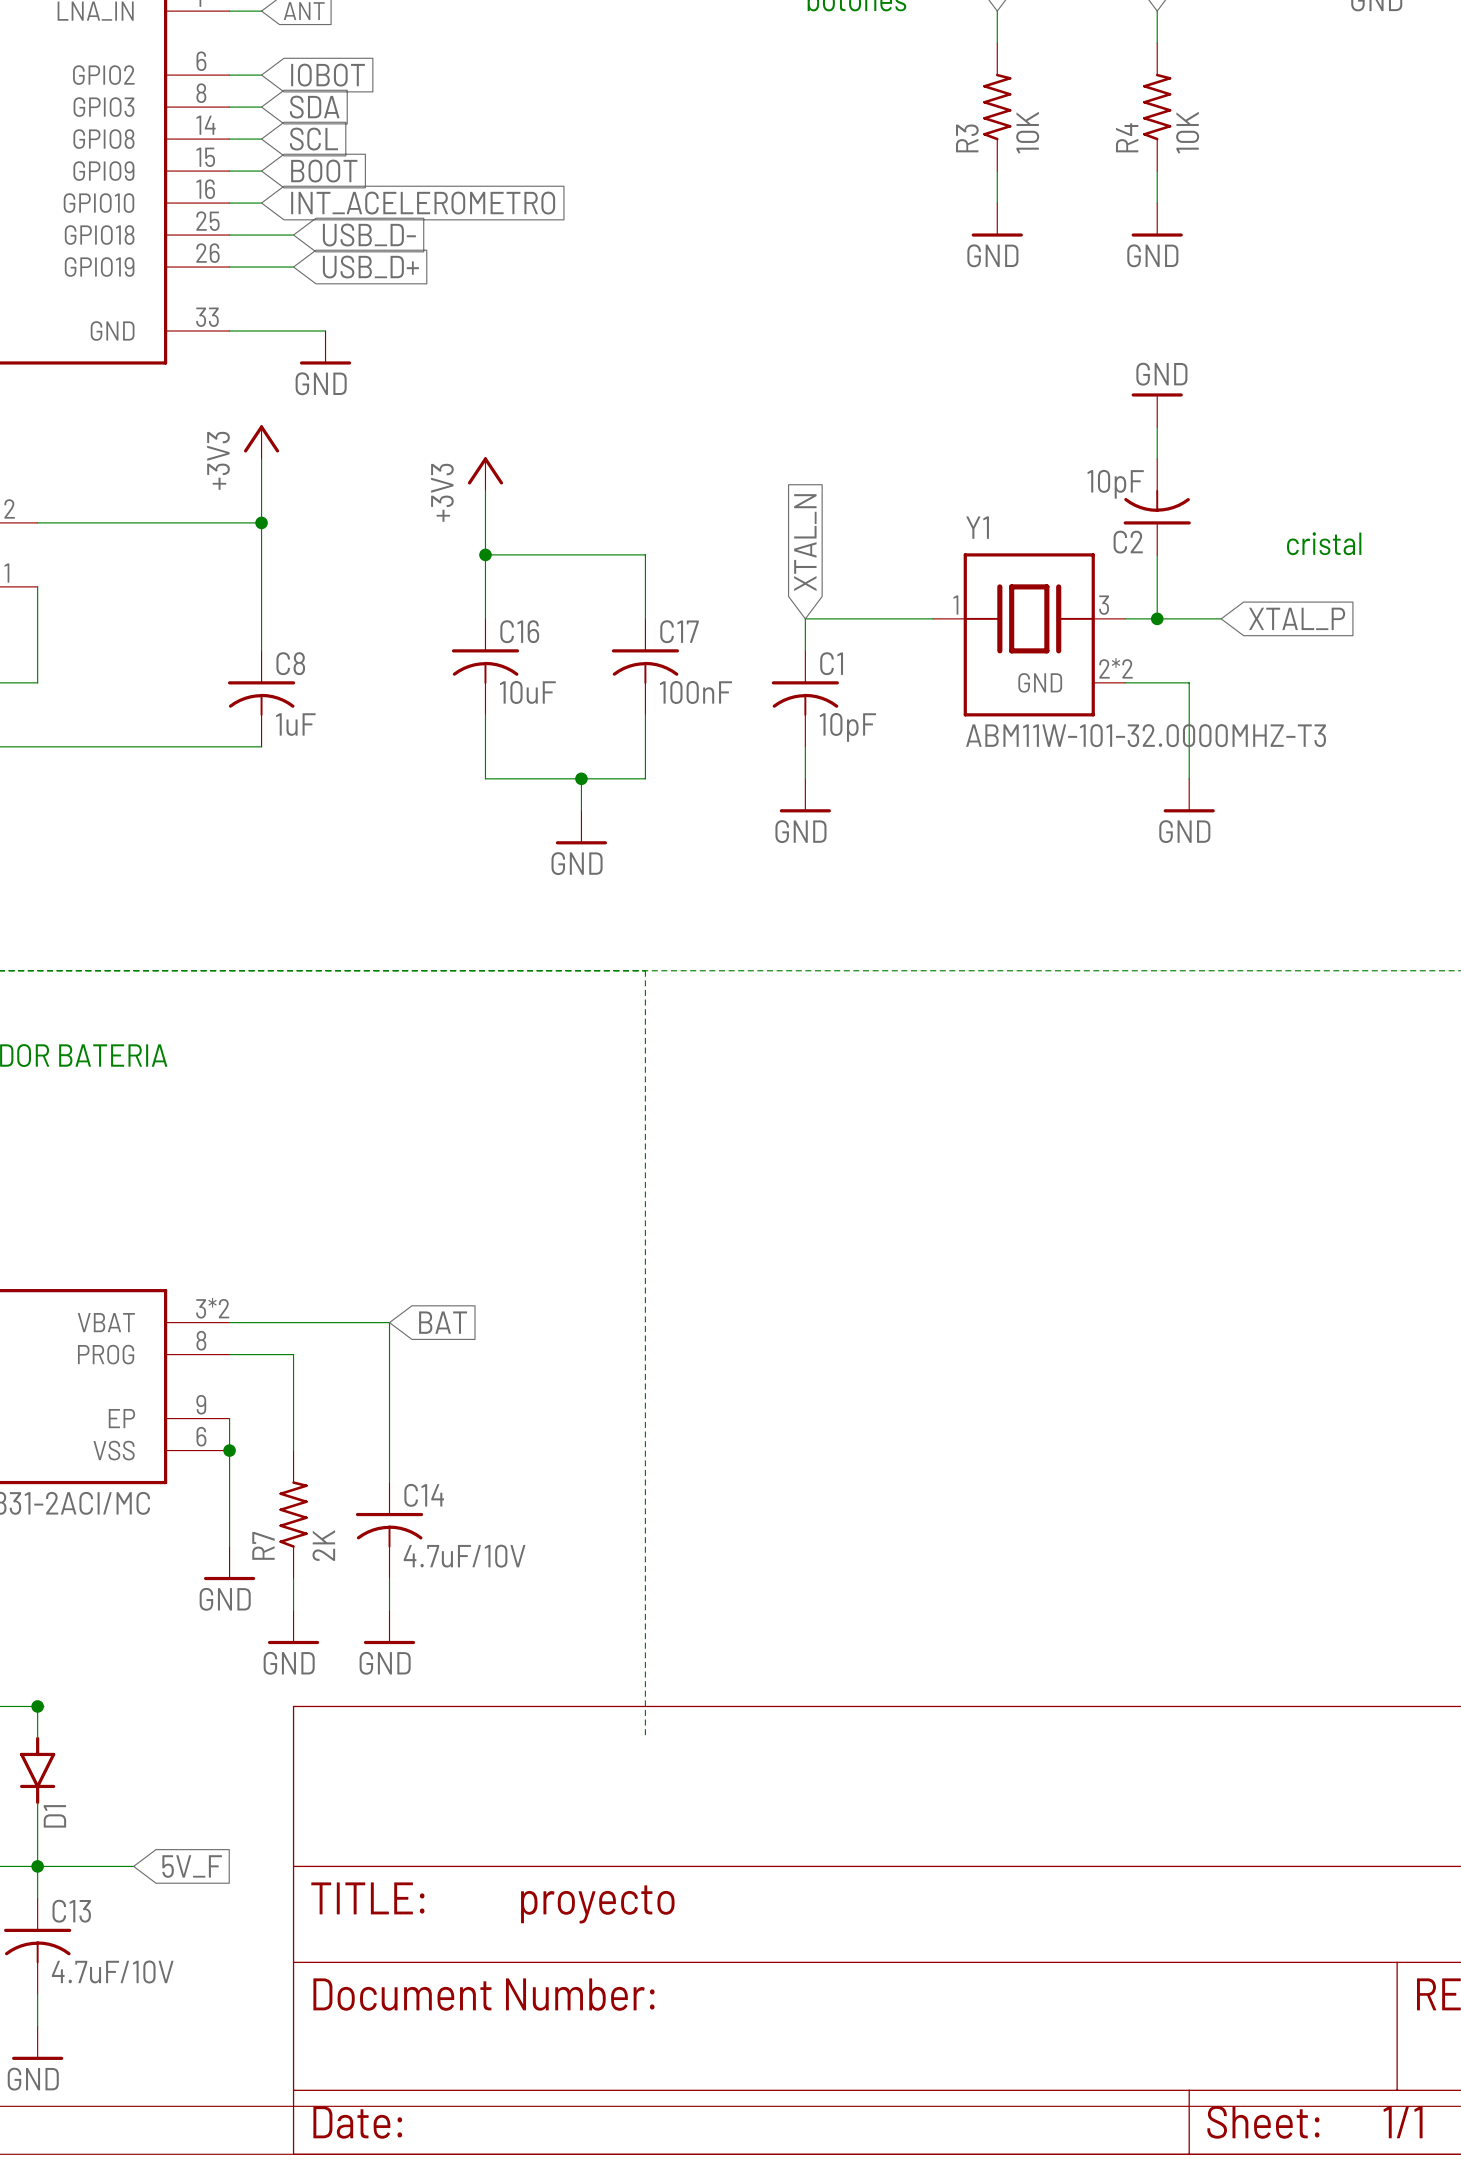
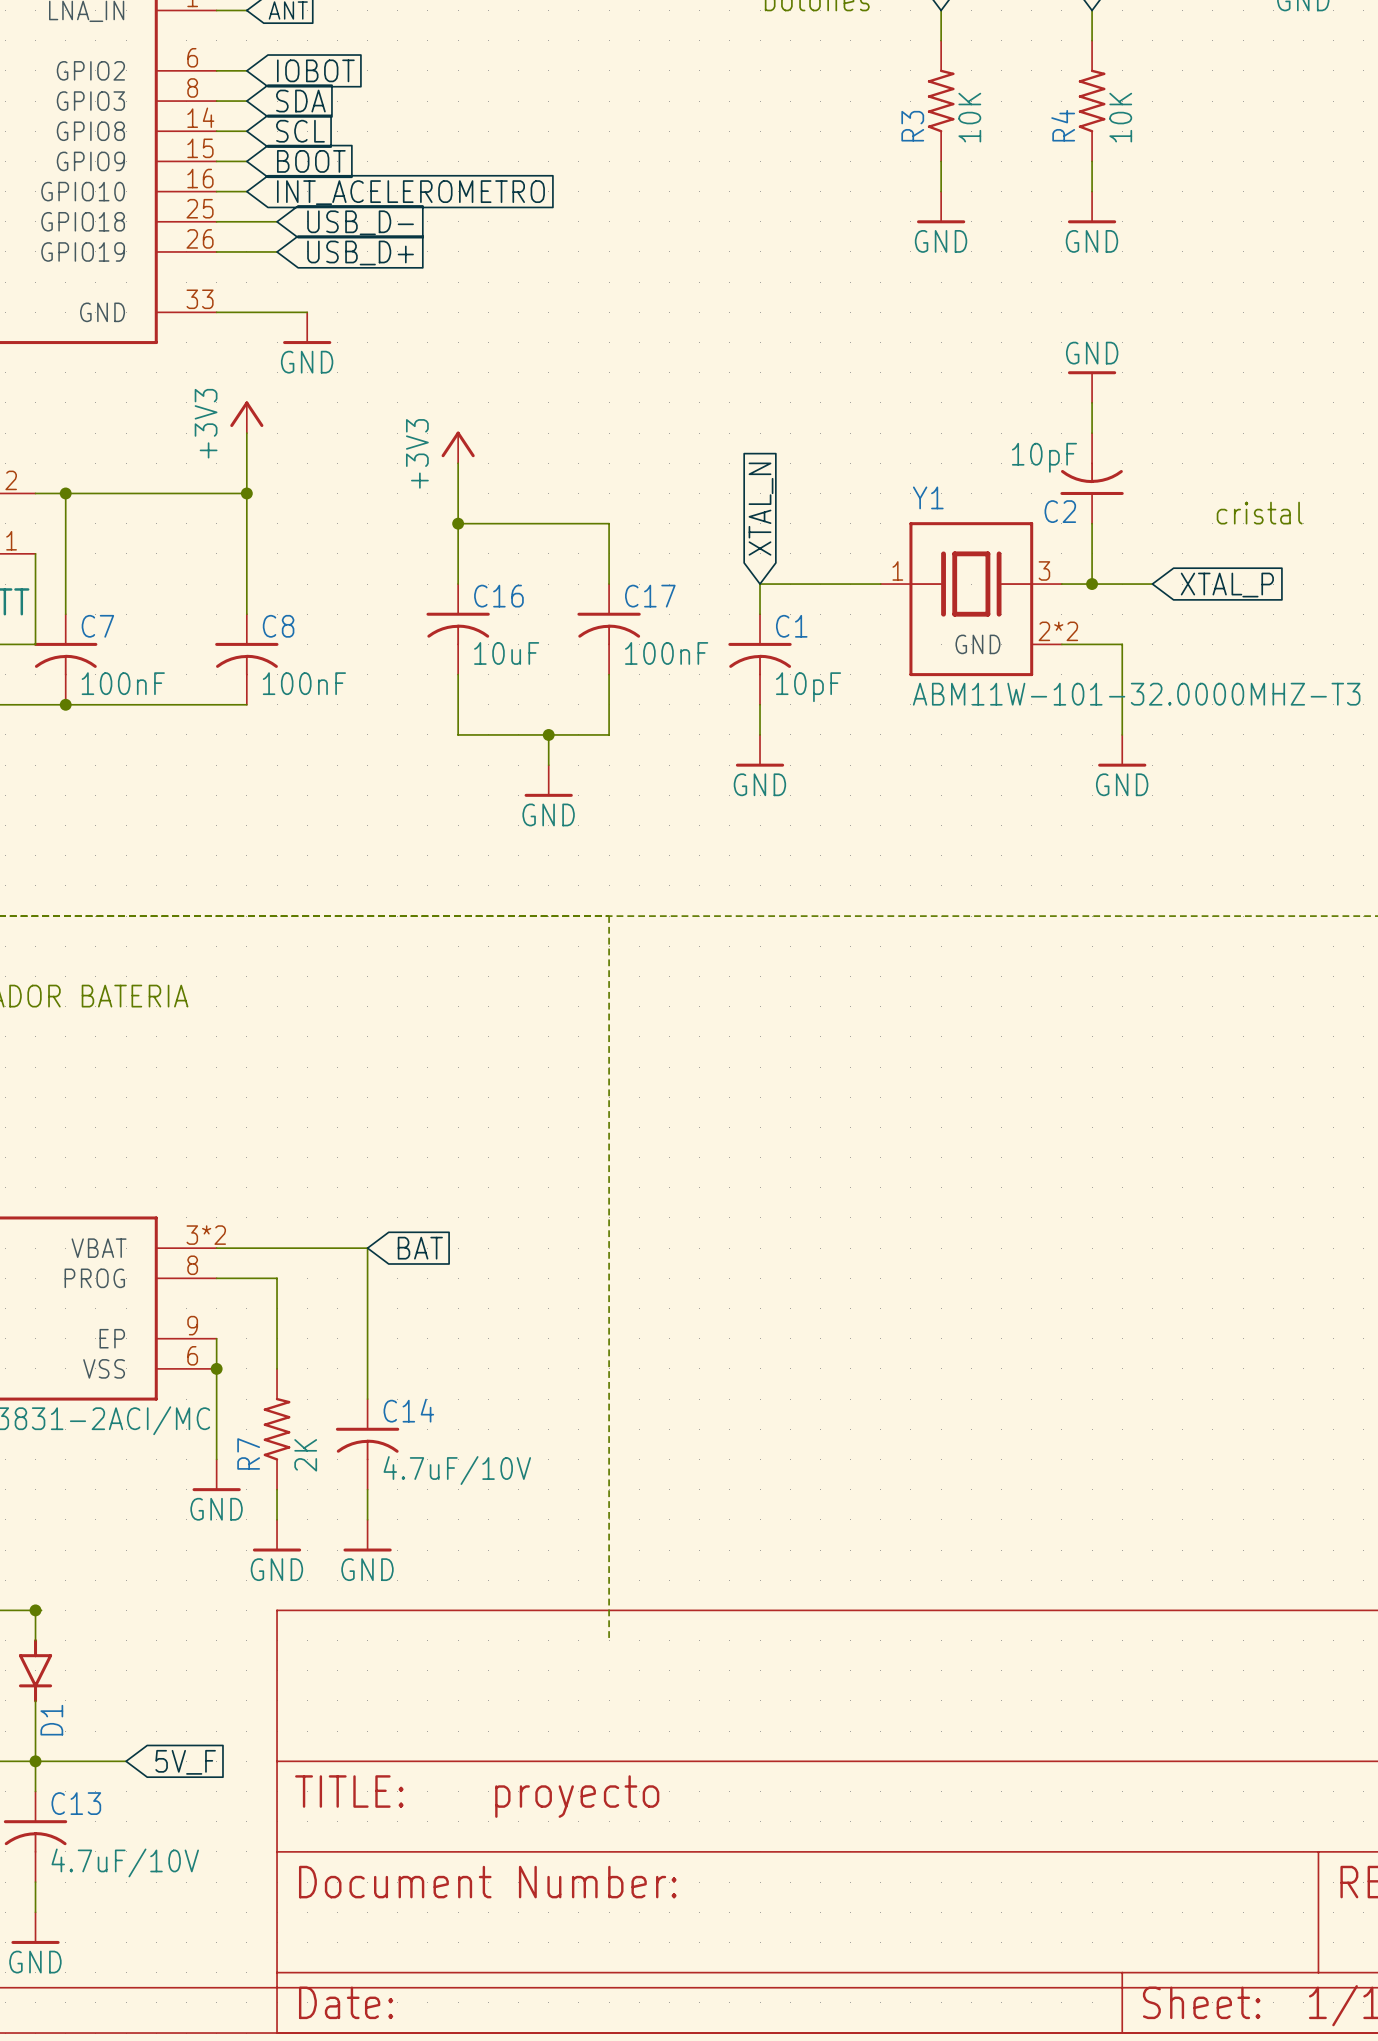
wire: none -> (65, 493) (65, 614)
junction: none -> (65, 493)
C7: none -> 100nF (65, 659)
C8 value: 1uF (295, 724) -> 100nF (304, 683)
junction: none -> (65, 704)

